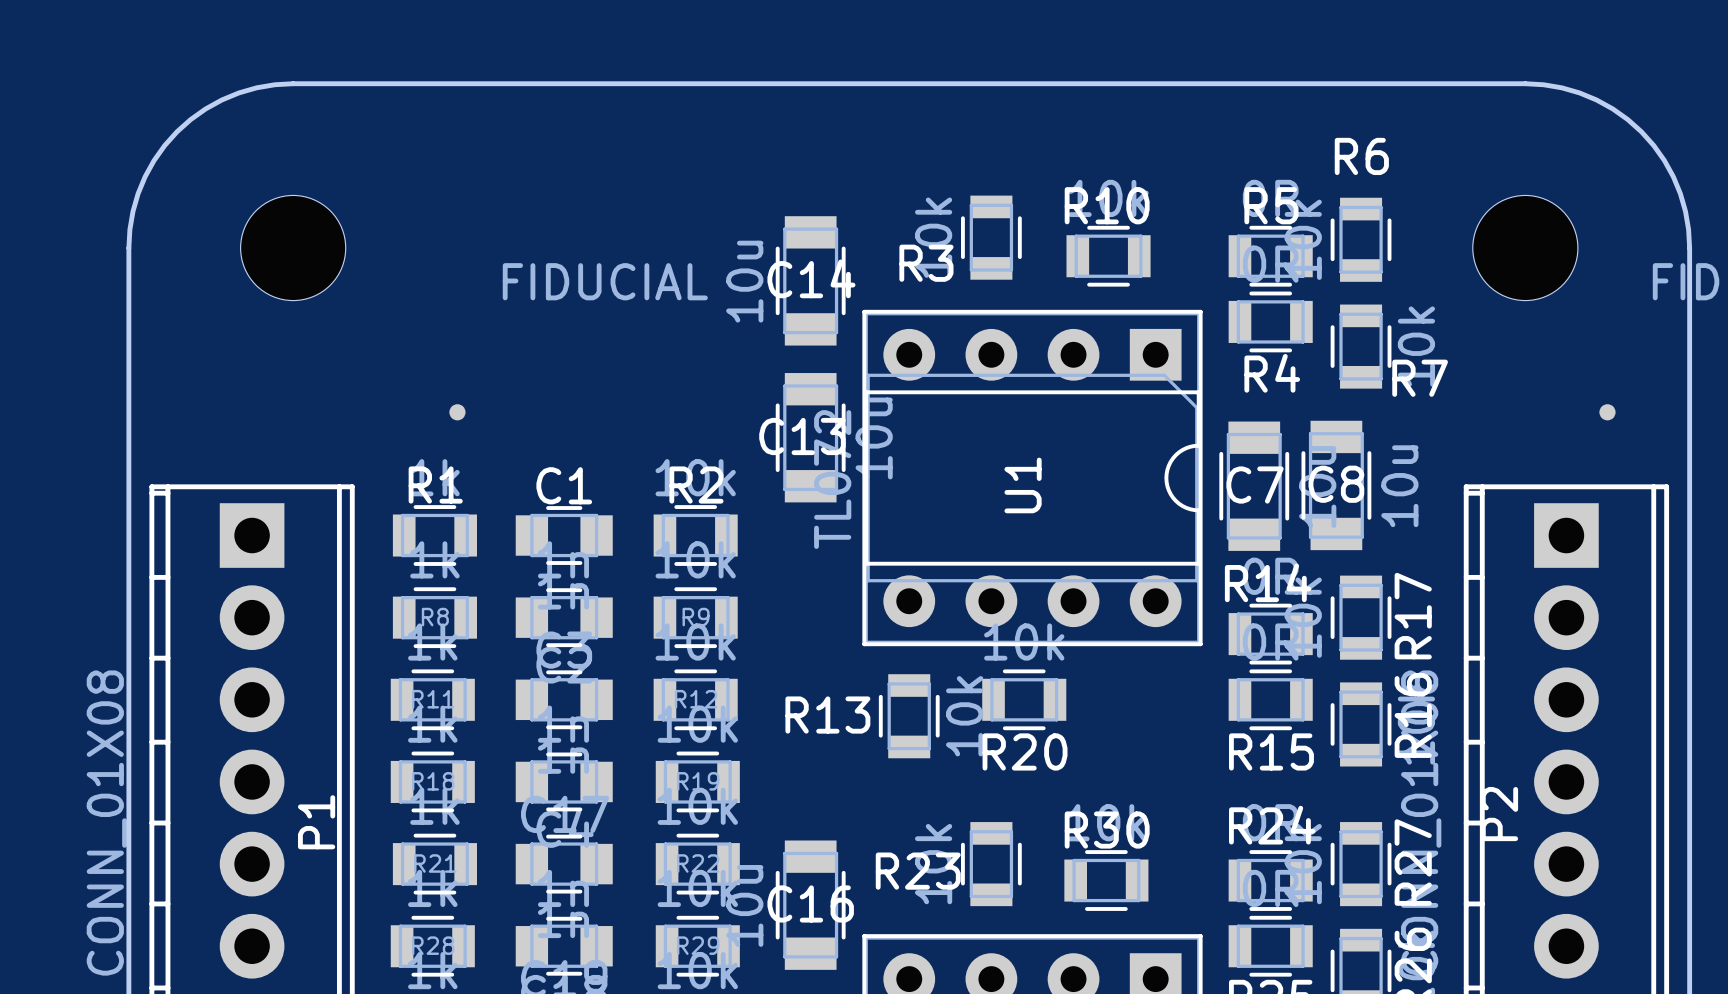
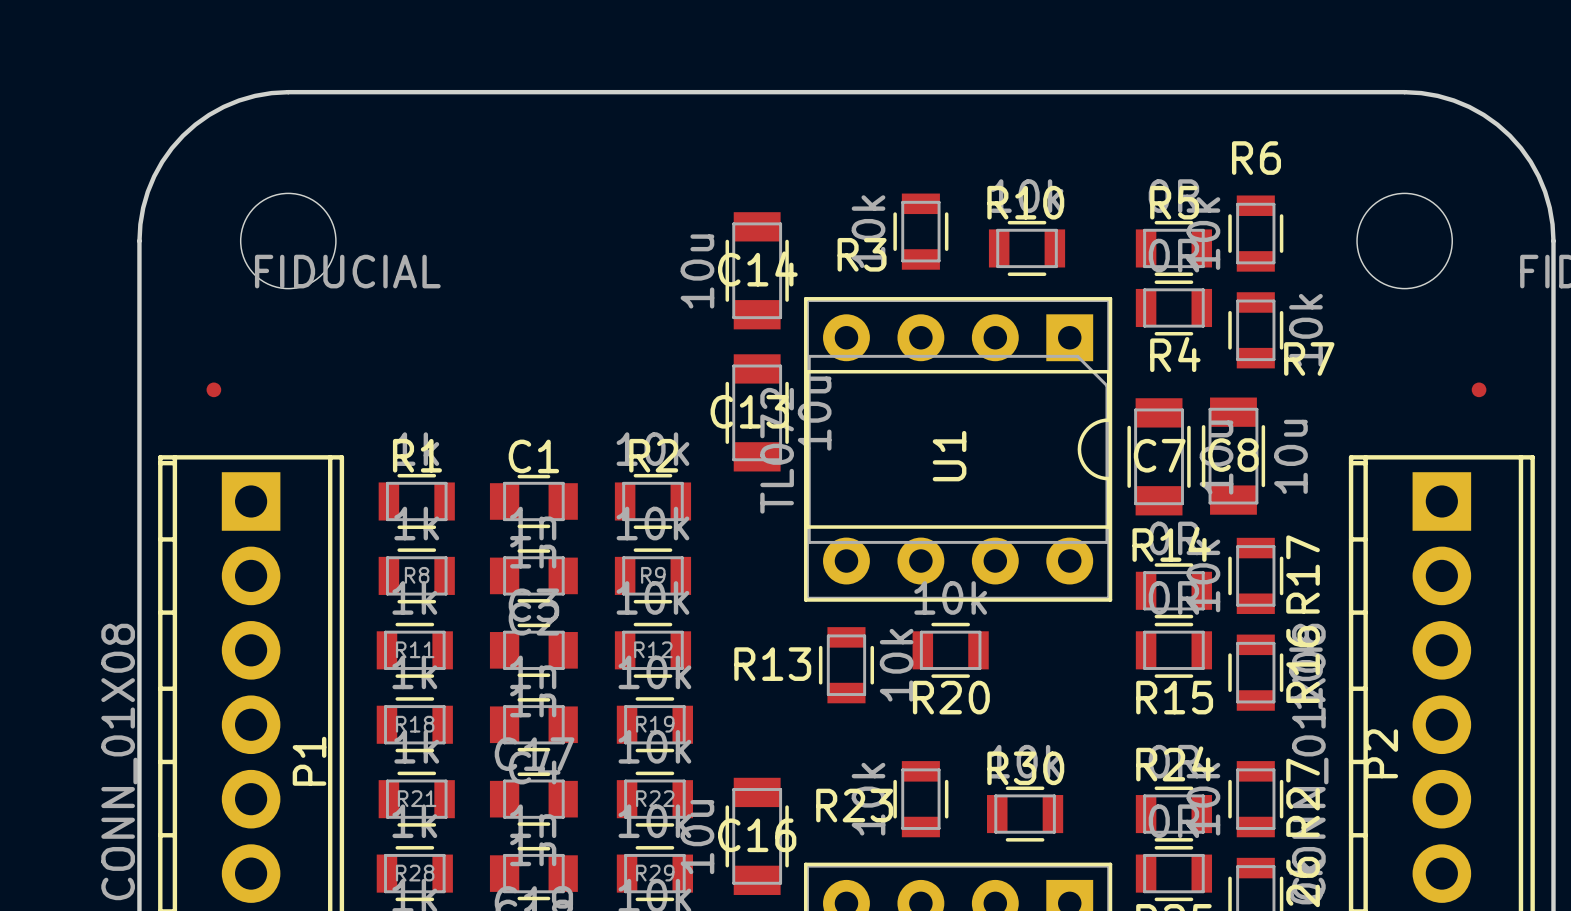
part position: (457, 412) -> (213, 389)

